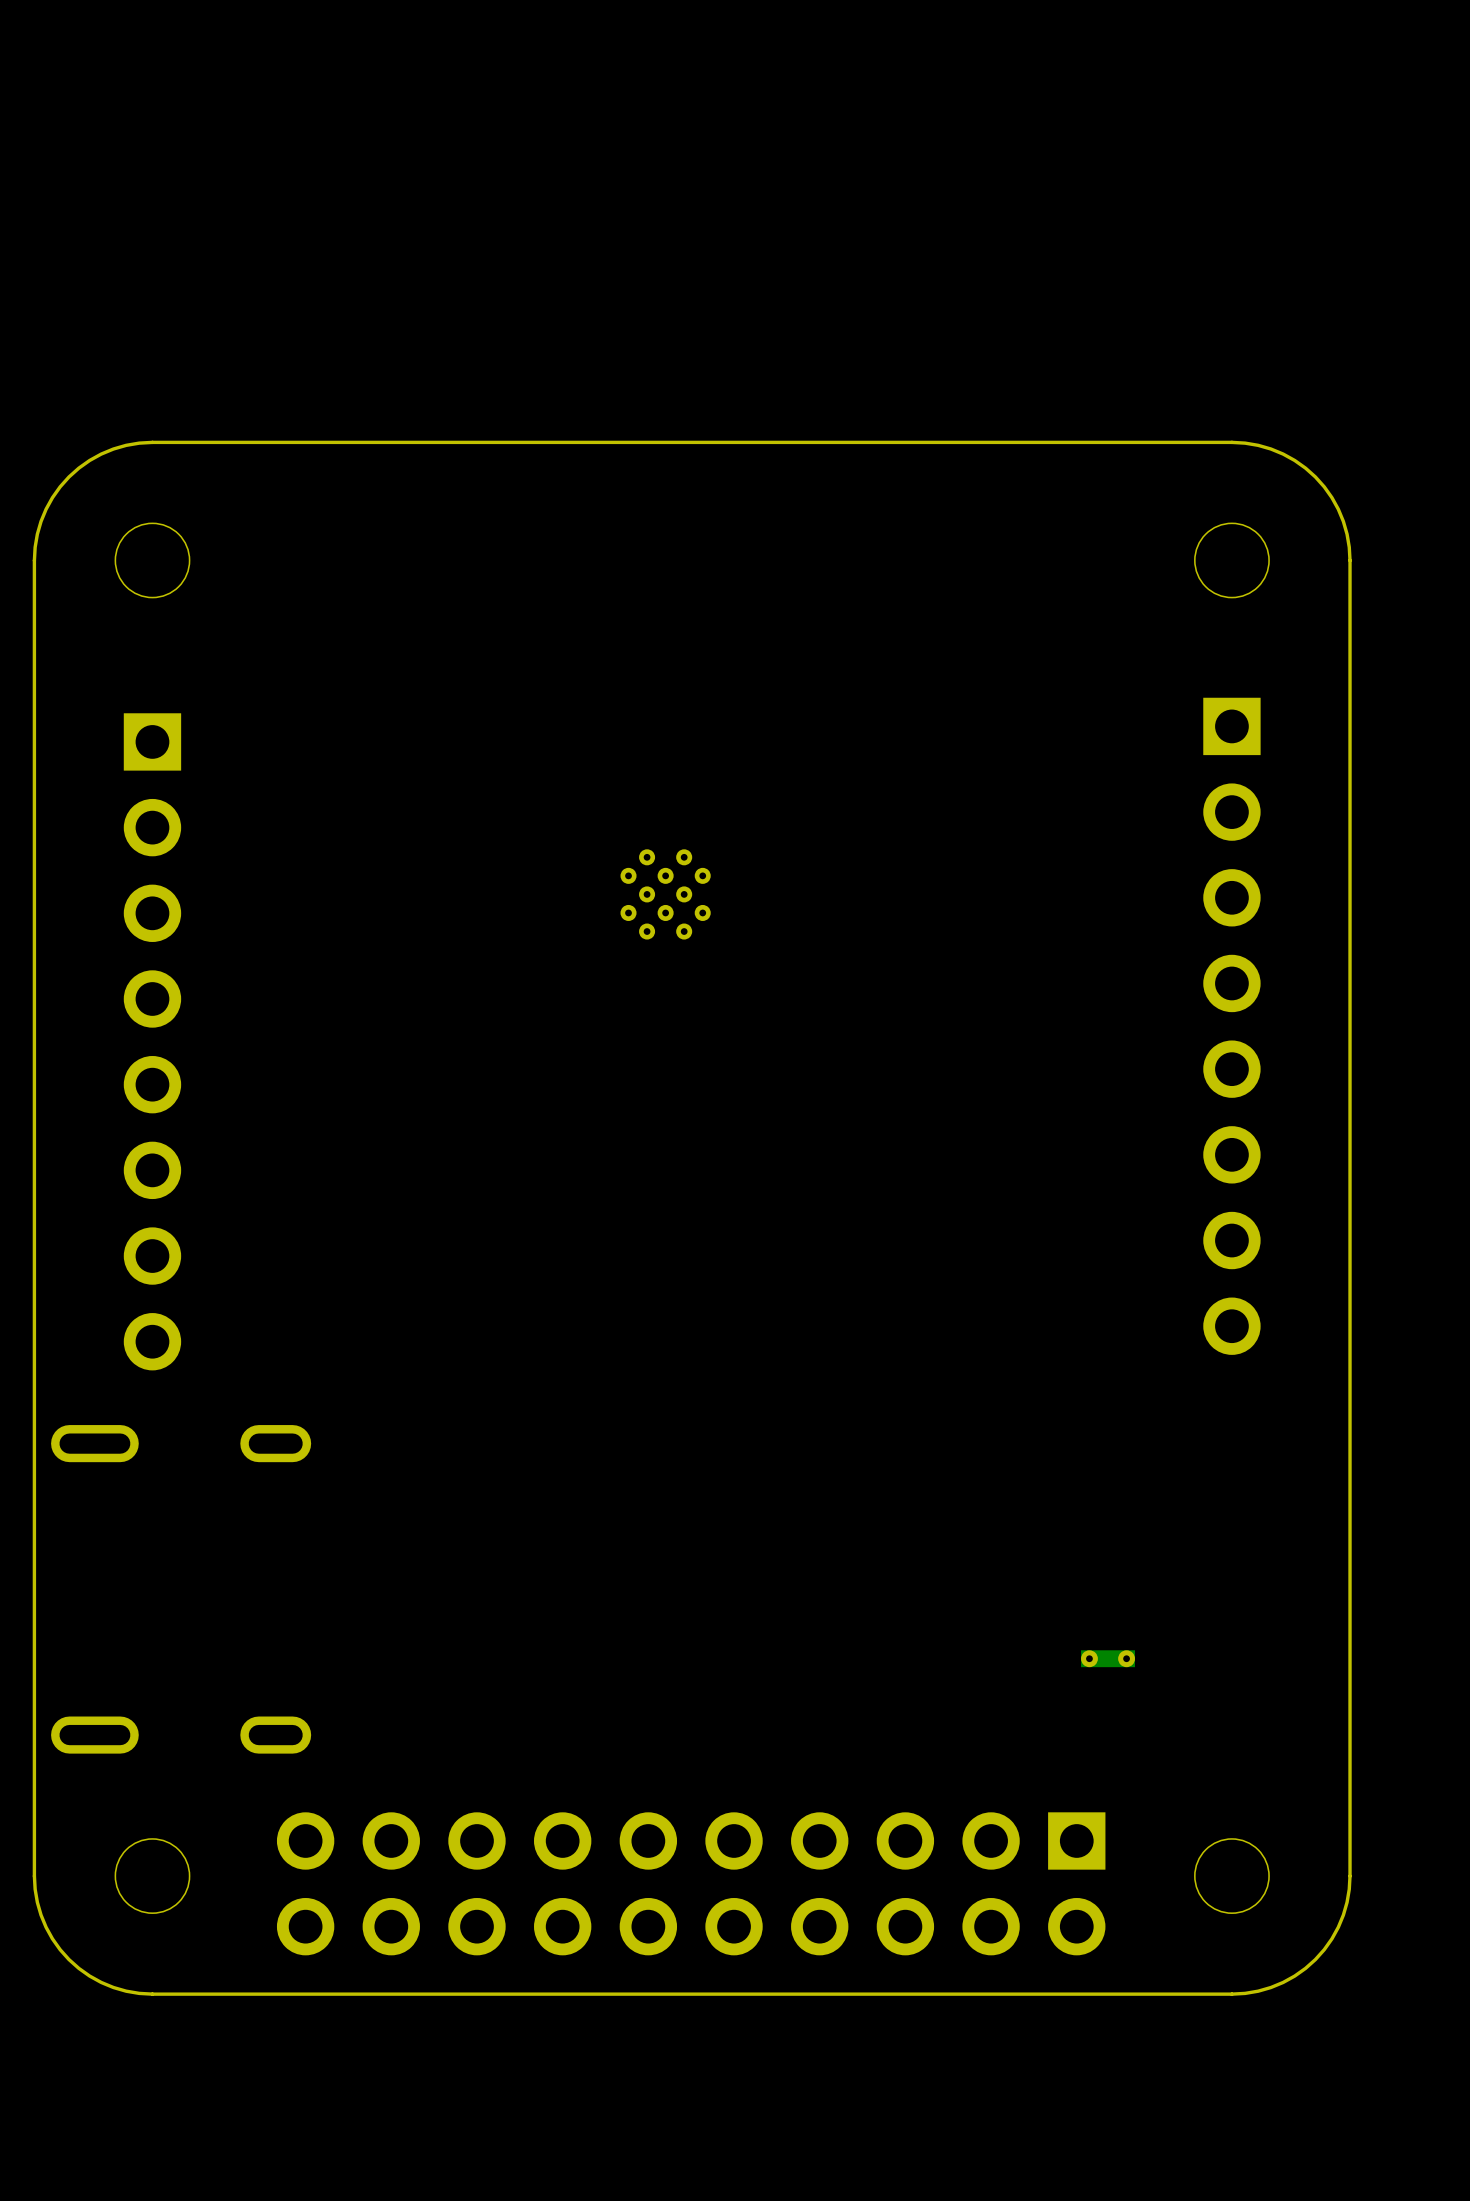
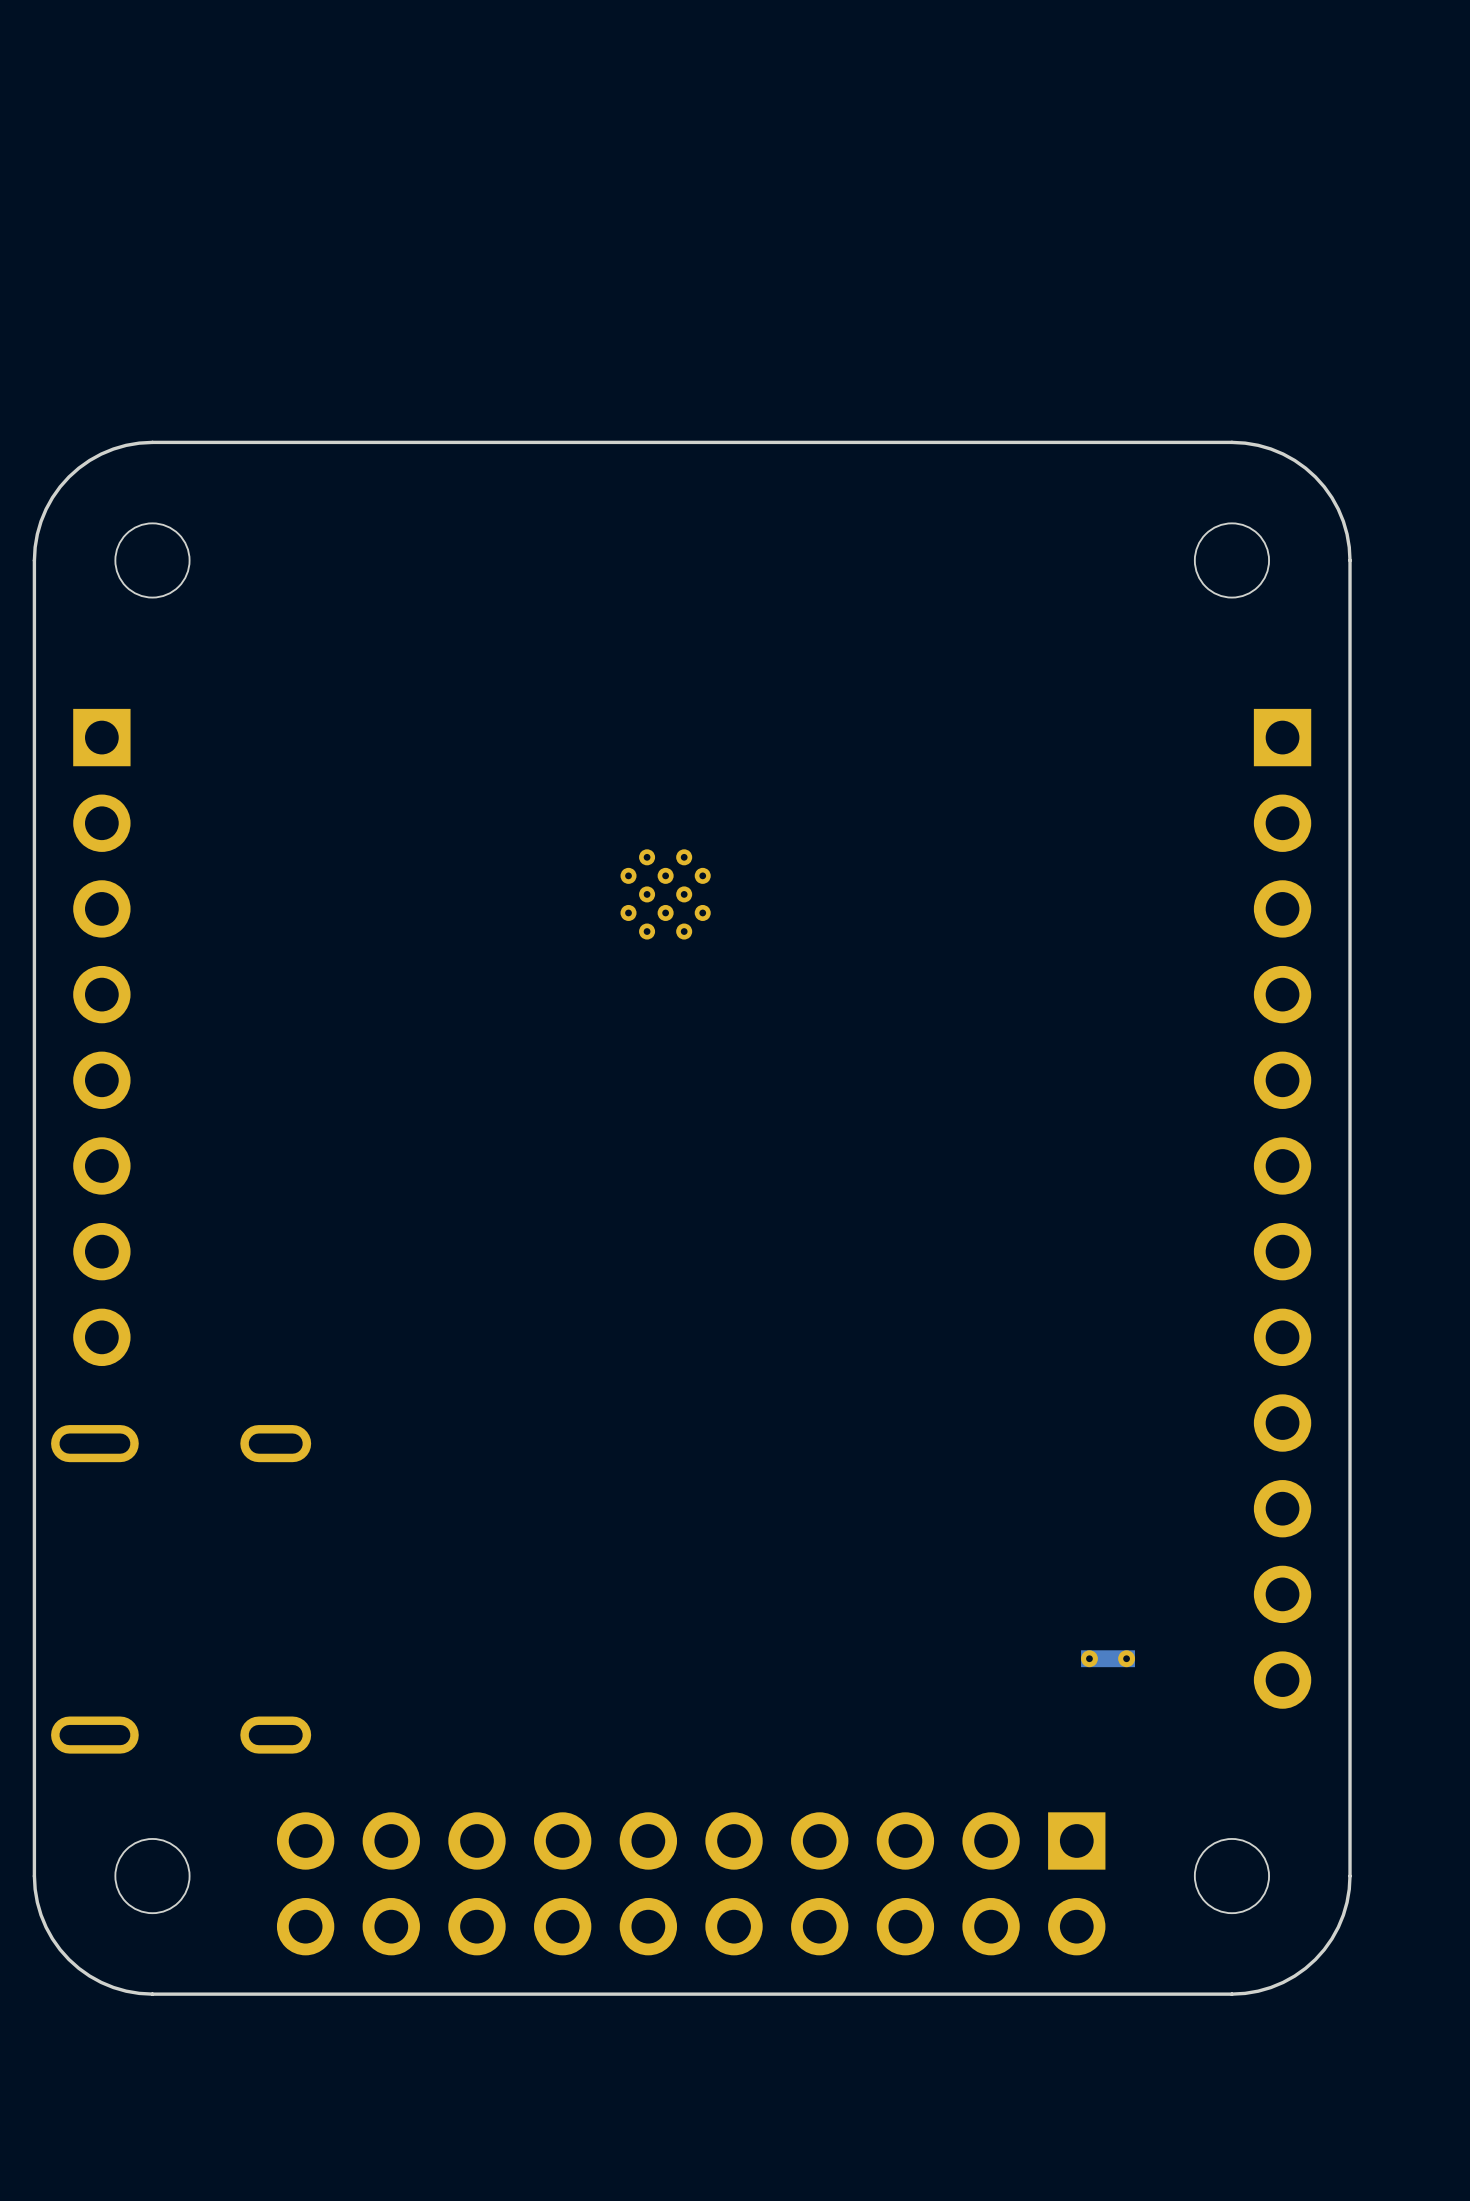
part: (1231, 1026) -> none
part position: (152, 1041) -> (101, 1037)
part: none -> (1282, 1208)

